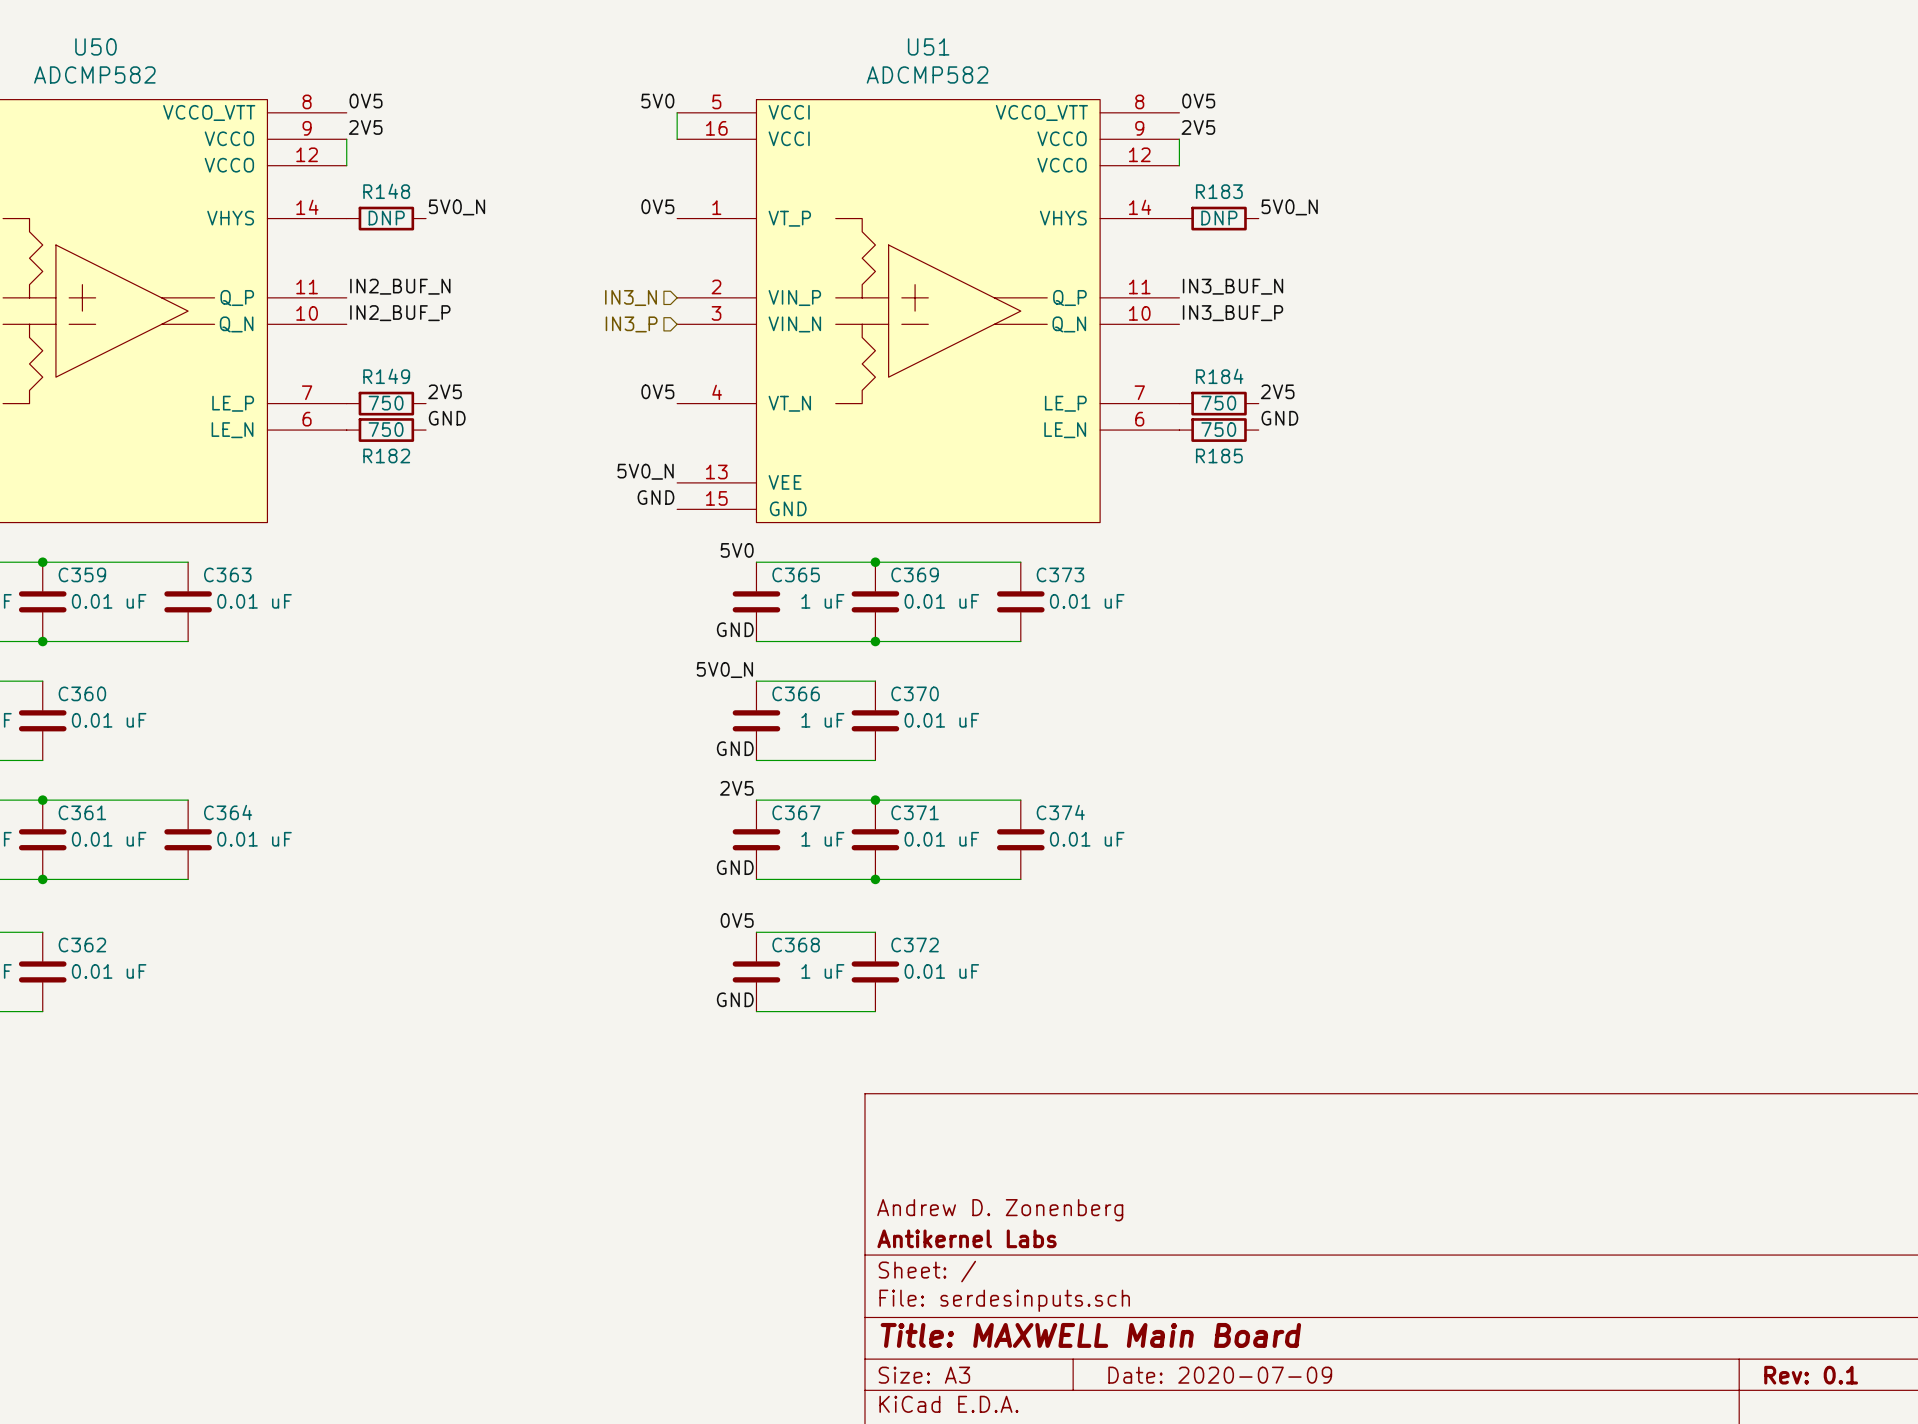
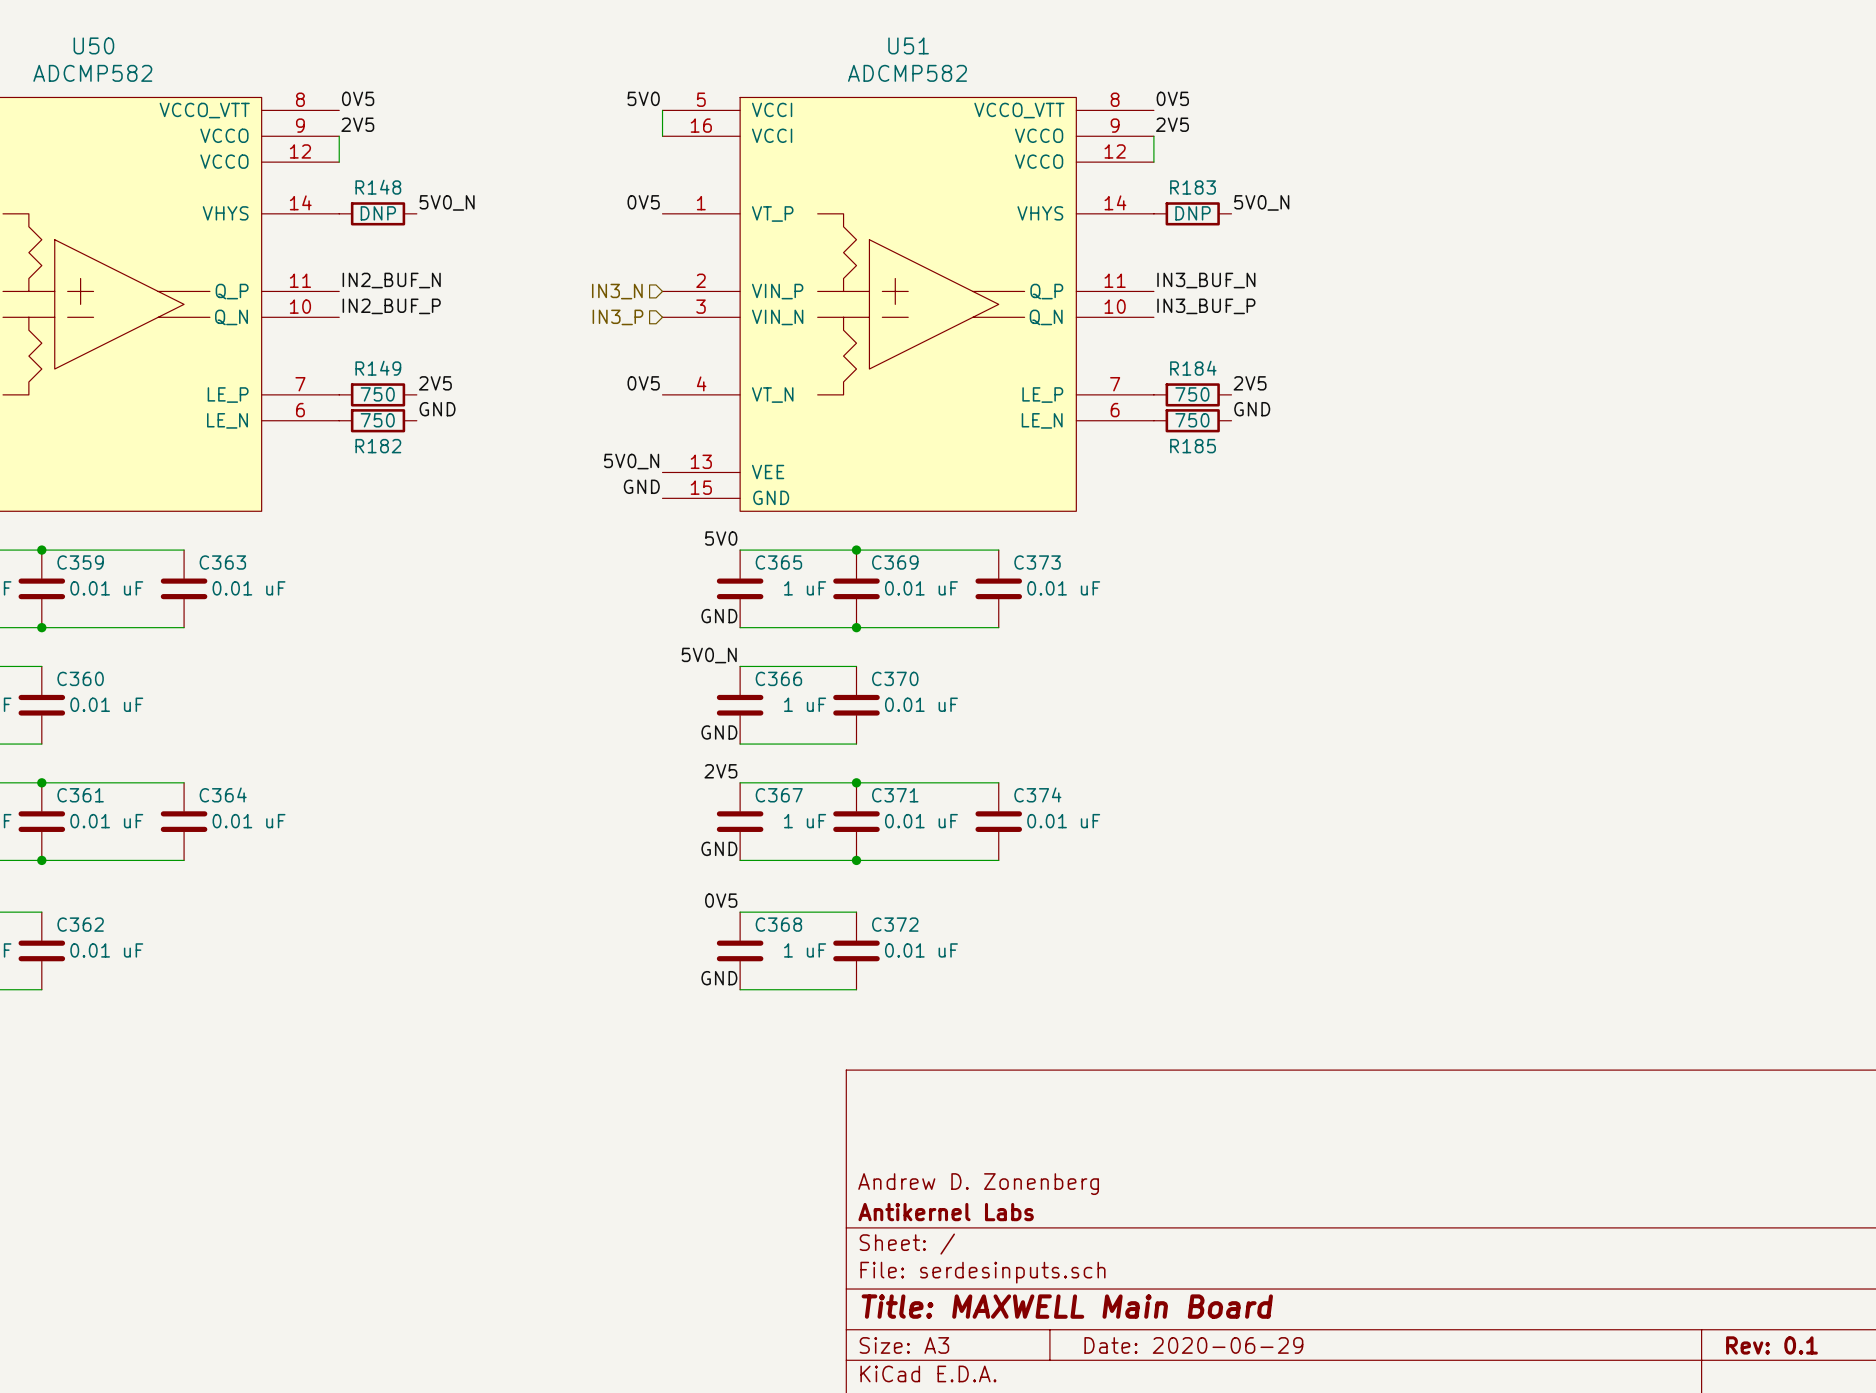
title block: Date: 2020-07-09 (1220, 1375) -> Date: 2020-06-29 (1193, 1345)

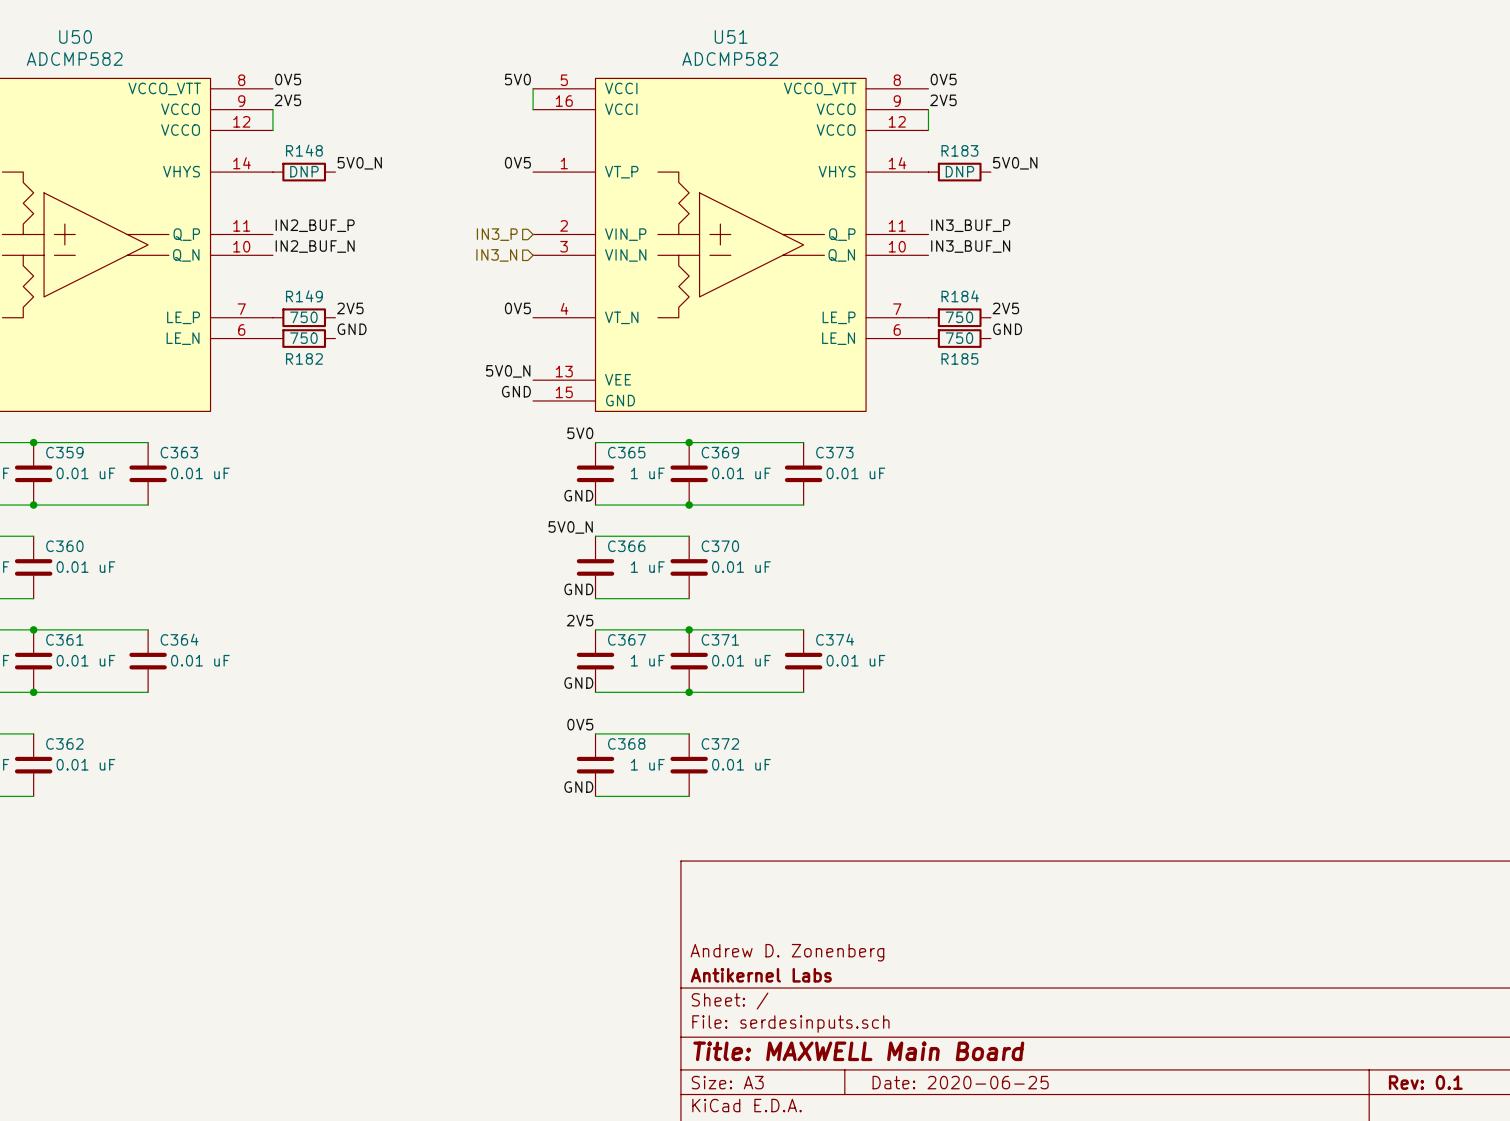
label: IN2_BUF_N (391, 280) -> IN2_BUF_P (315, 225)
label: IN3_BUF_N (1206, 280) -> IN3_BUF_P (970, 225)
hierarchical label: IN3_N (617, 291) -> IN3_P (497, 234)
label: IN2_BUF_P (391, 306) -> IN2_BUF_N (315, 246)
label: IN3_BUF_P (1206, 306) -> IN3_BUF_N (970, 246)
hierarchical label: IN3_P (617, 317) -> IN3_N (496, 255)
title block: Date: 2020-06-29 (1193, 1345) -> Date: 2020-06-25 (960, 1082)

